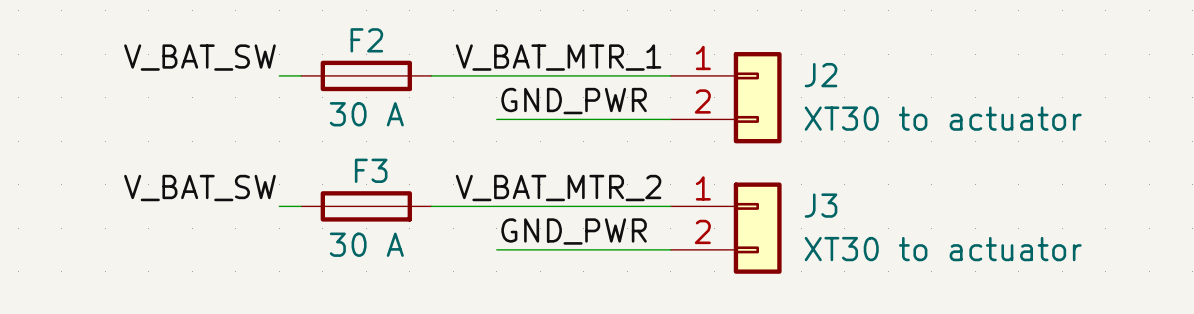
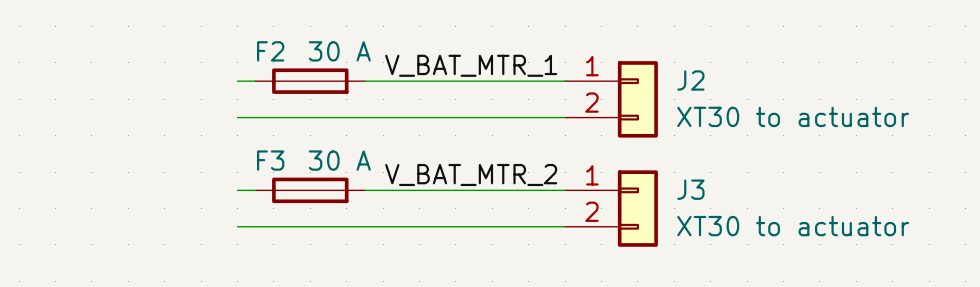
F2 name position: F2 (366, 40) -> F2 (270, 51)
label: V_BAT_SW (199, 57) -> none
label: GND_PWR (574, 101) -> none
F2 value position: 30 A (366, 114) -> 30 A (339, 51)
wire: none -> (237, 117) (419, 117)
F3 name position: F3 (371, 170) -> F3 (270, 160)
label: V_BAT_SW (199, 188) -> none
label: GND_PWR (574, 231) -> none
F3 value position: 30 A (366, 244) -> 30 A (339, 160)
wire: none -> (237, 226) (419, 226)

